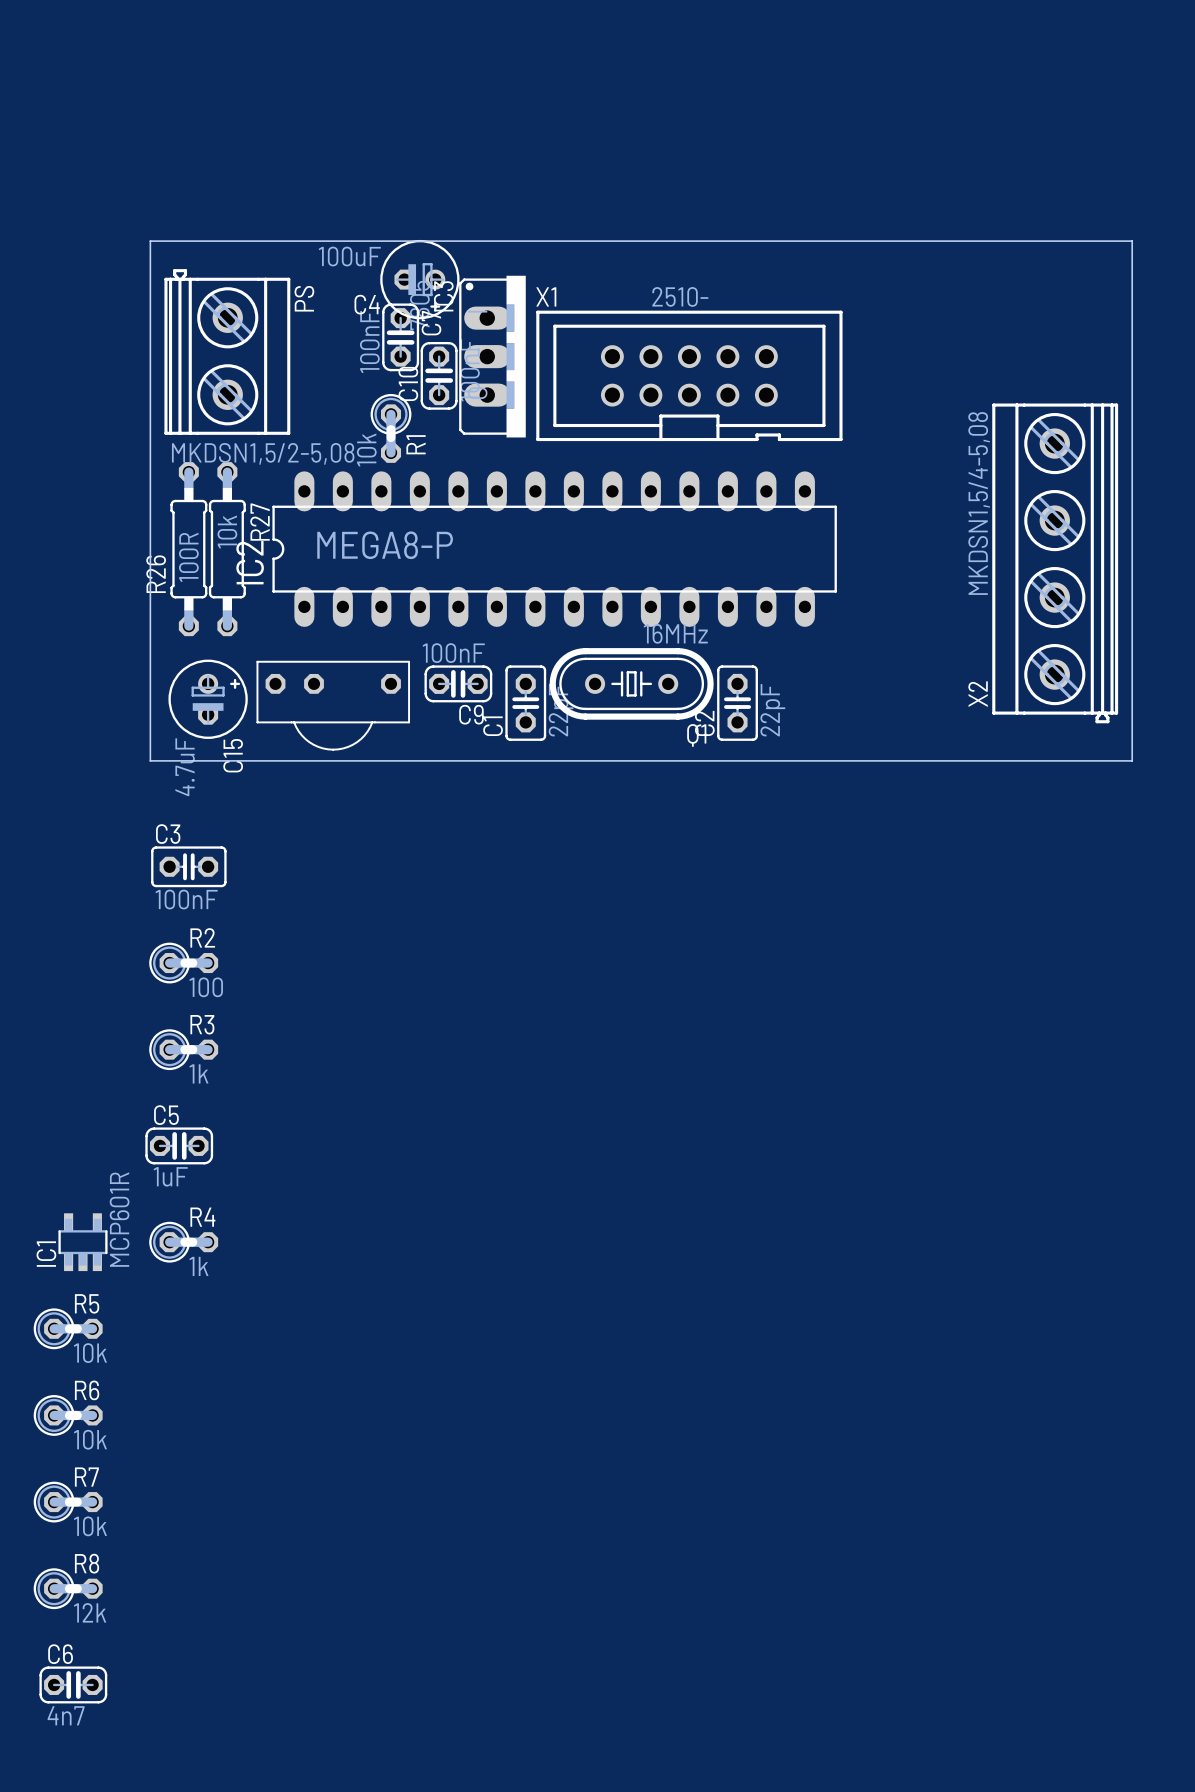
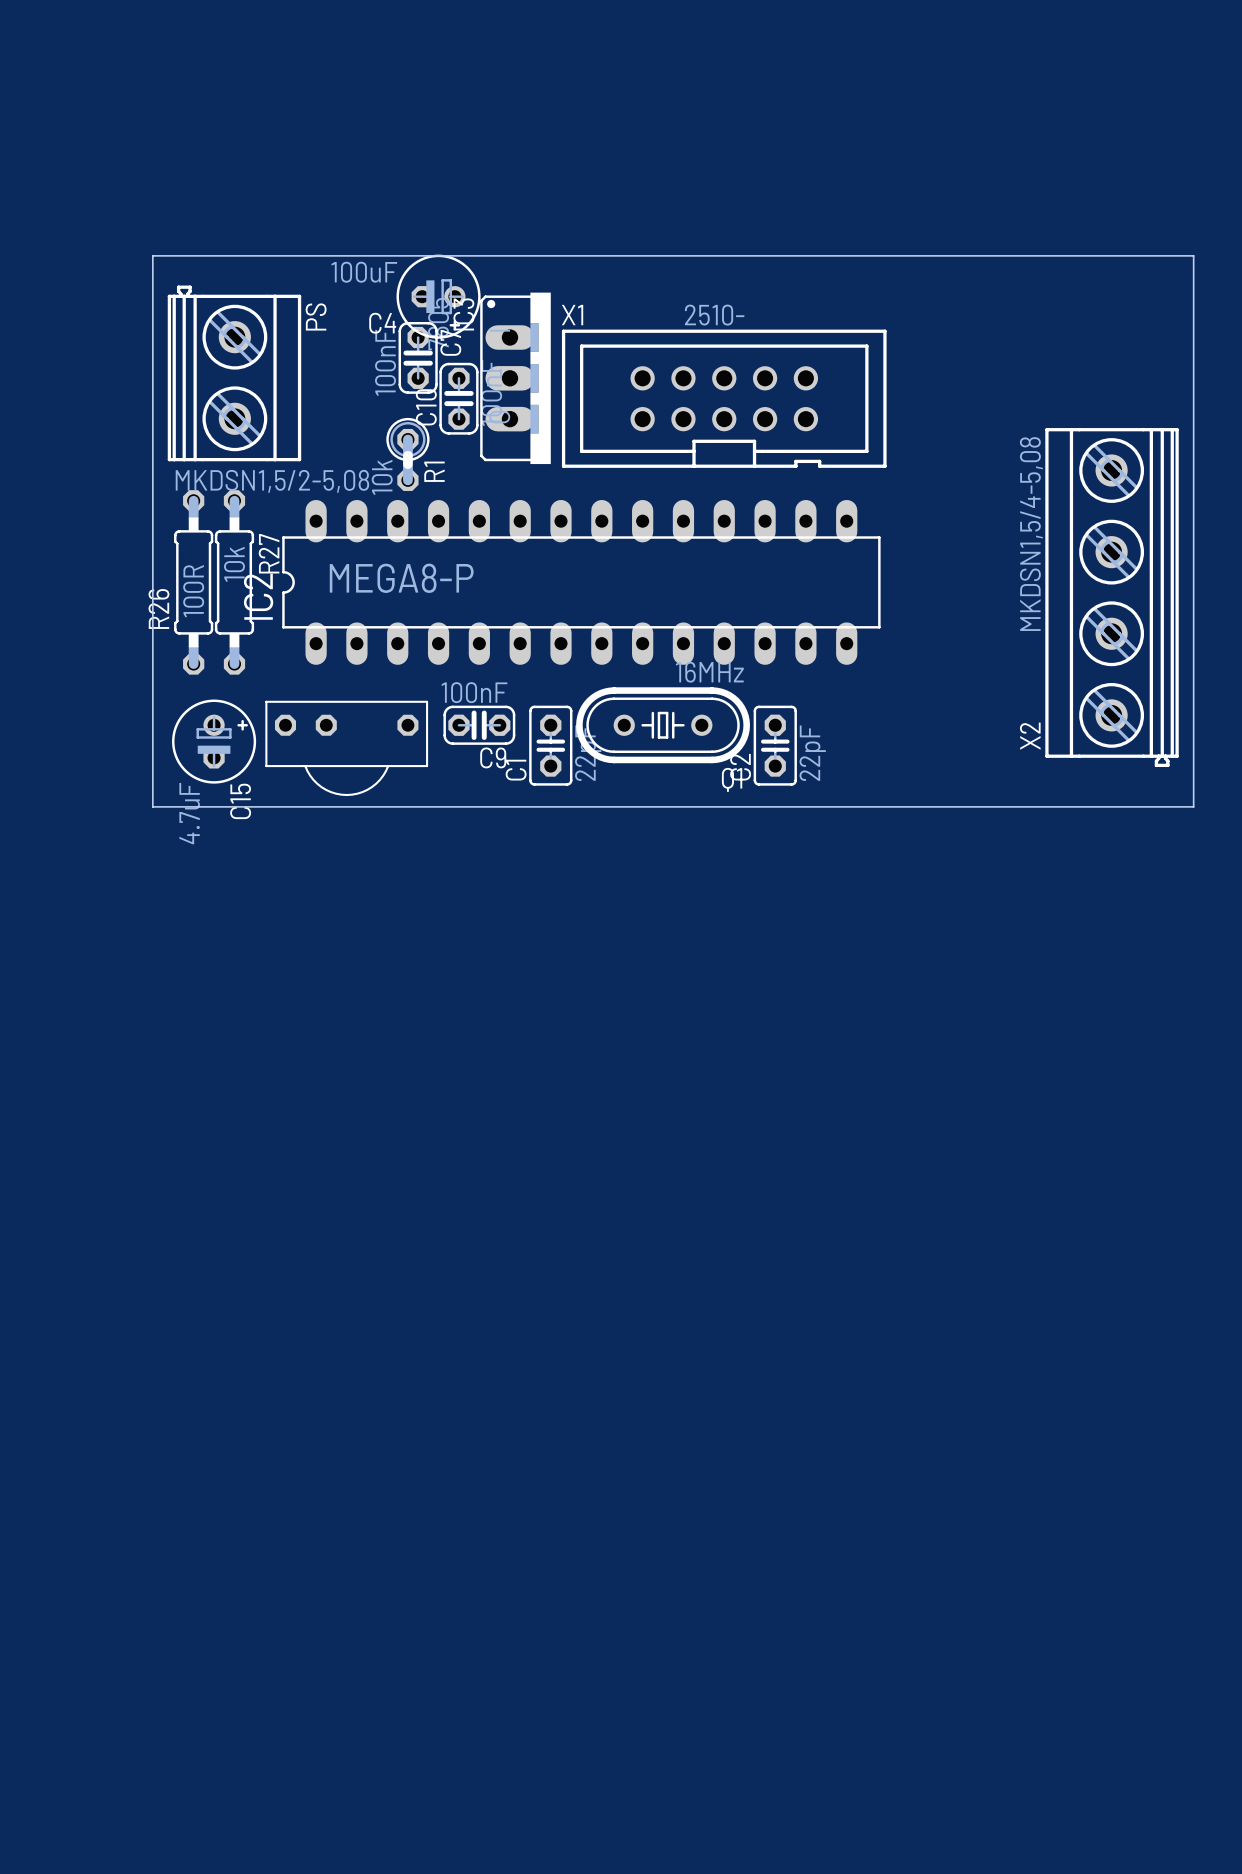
C3: 100nF (188, 866) -> none
R2: 100 (183, 963) -> none
R3: 1k (183, 1049) -> none
C5: 1uF (179, 1145) -> none
IC1: MCP601R (82, 1242) -> none
R4: 1k (183, 1242) -> none
R5: 10k (68, 1328) -> none
R6: 10k (68, 1415) -> none
R7: 10k (68, 1502) -> none
R8: 12k (68, 1588) -> none
C6: 4n7 (73, 1684) -> none

